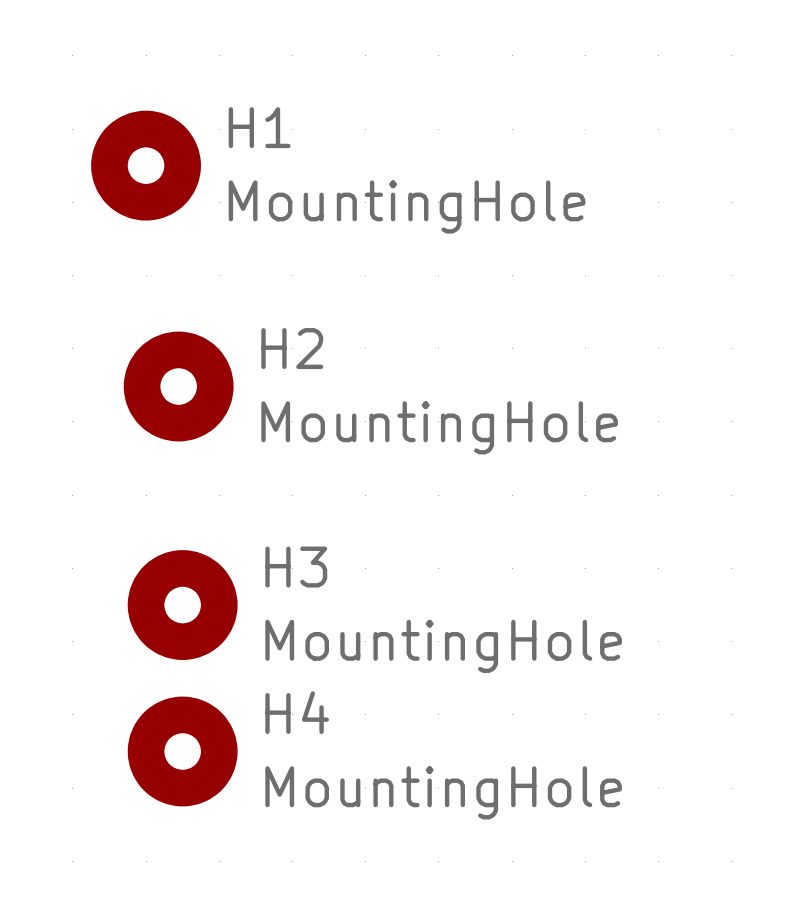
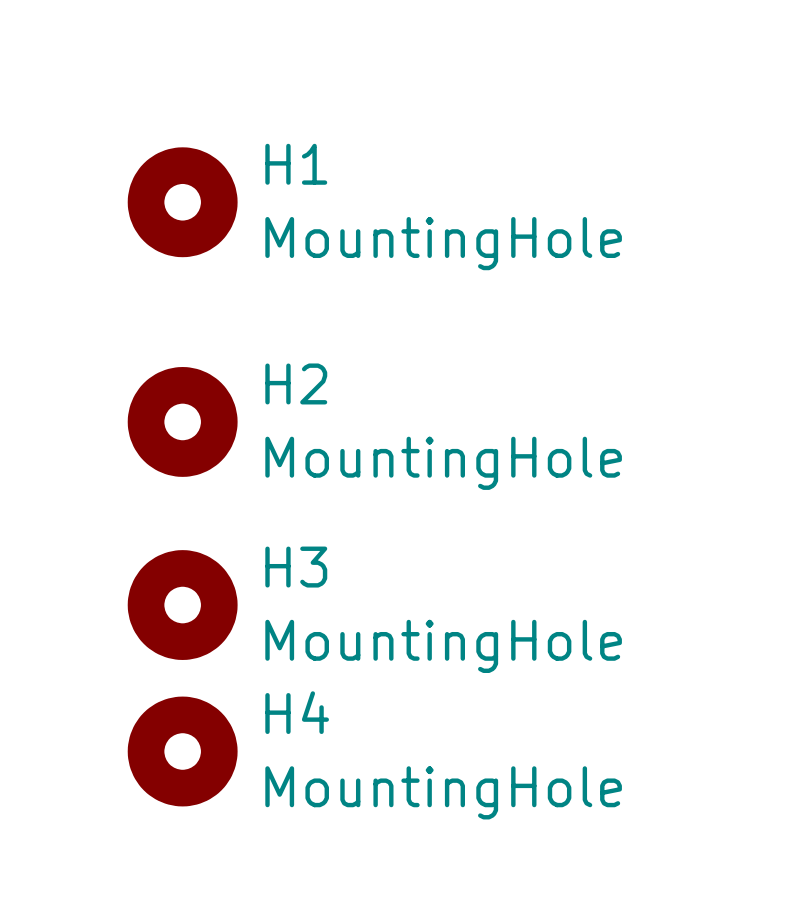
H1 position: (146, 165) -> (182, 202)
H2 position: (178, 386) -> (182, 421)

